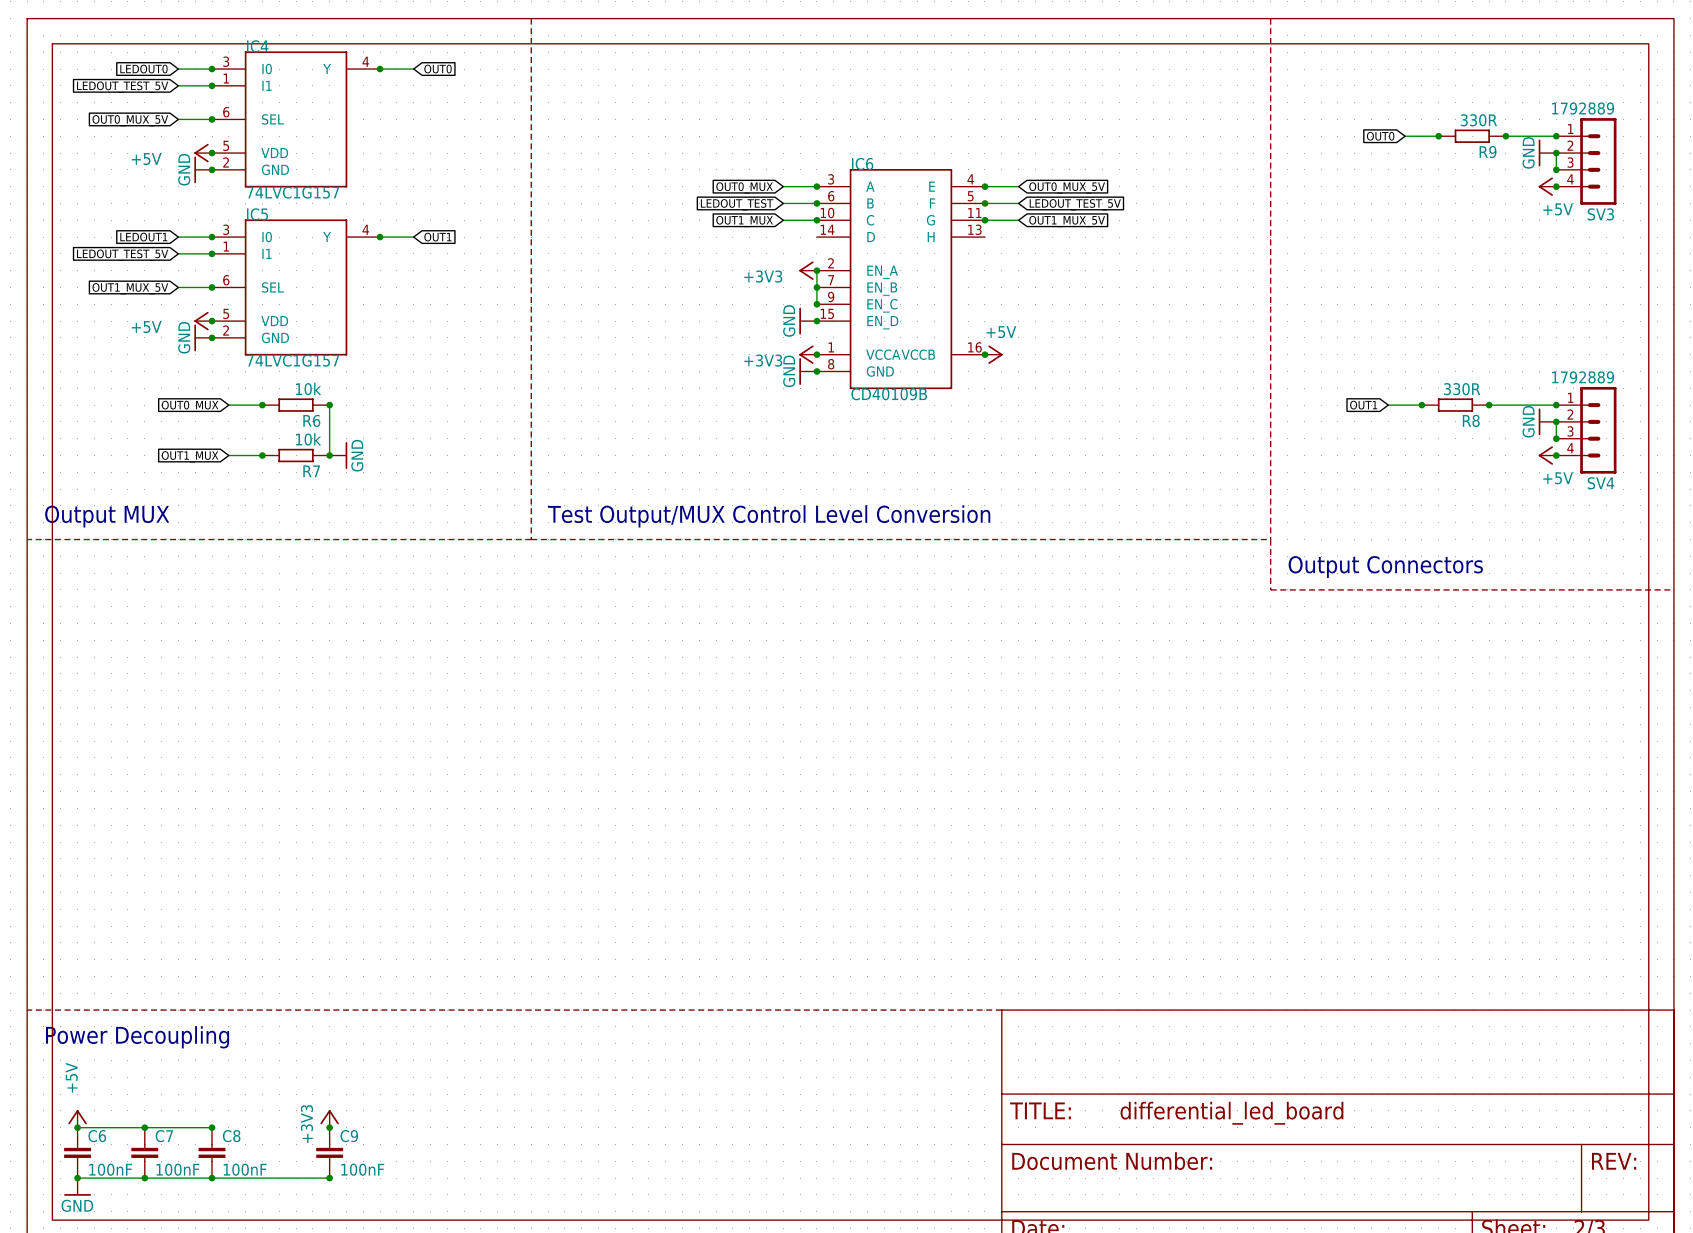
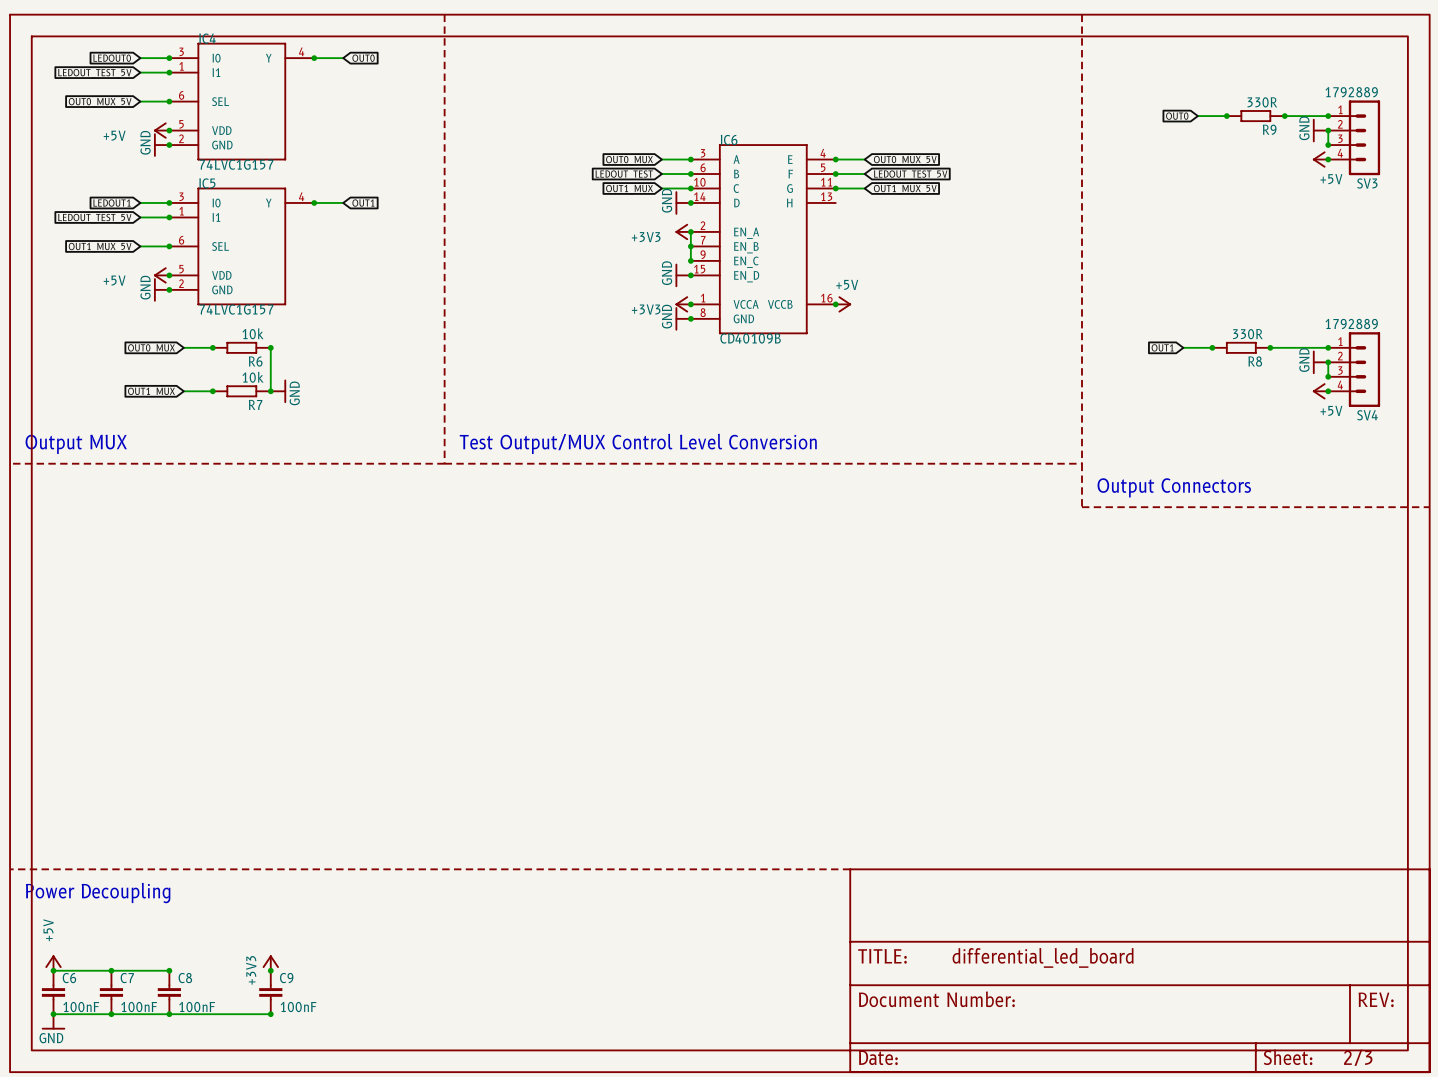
power symbol: none -> GND (683, 202)
junction: none -> (690, 202)

